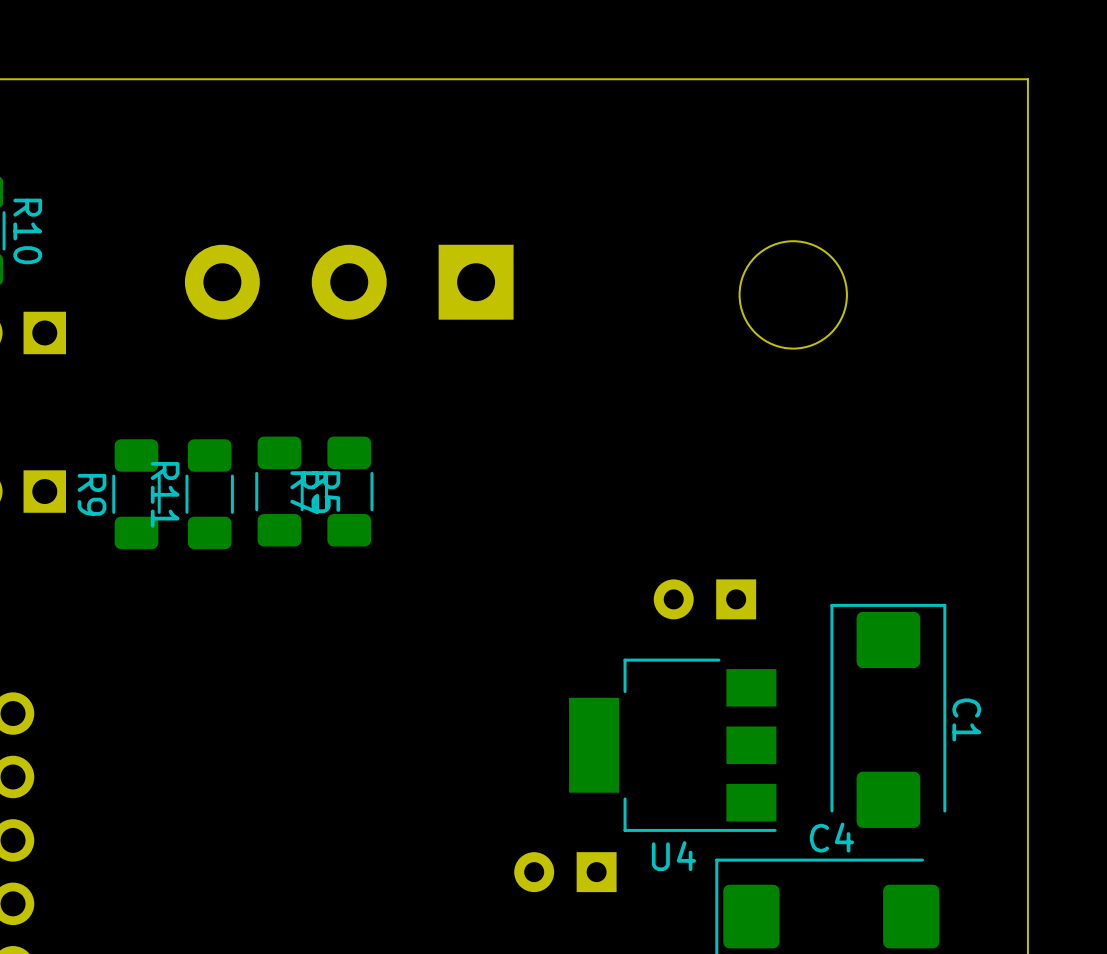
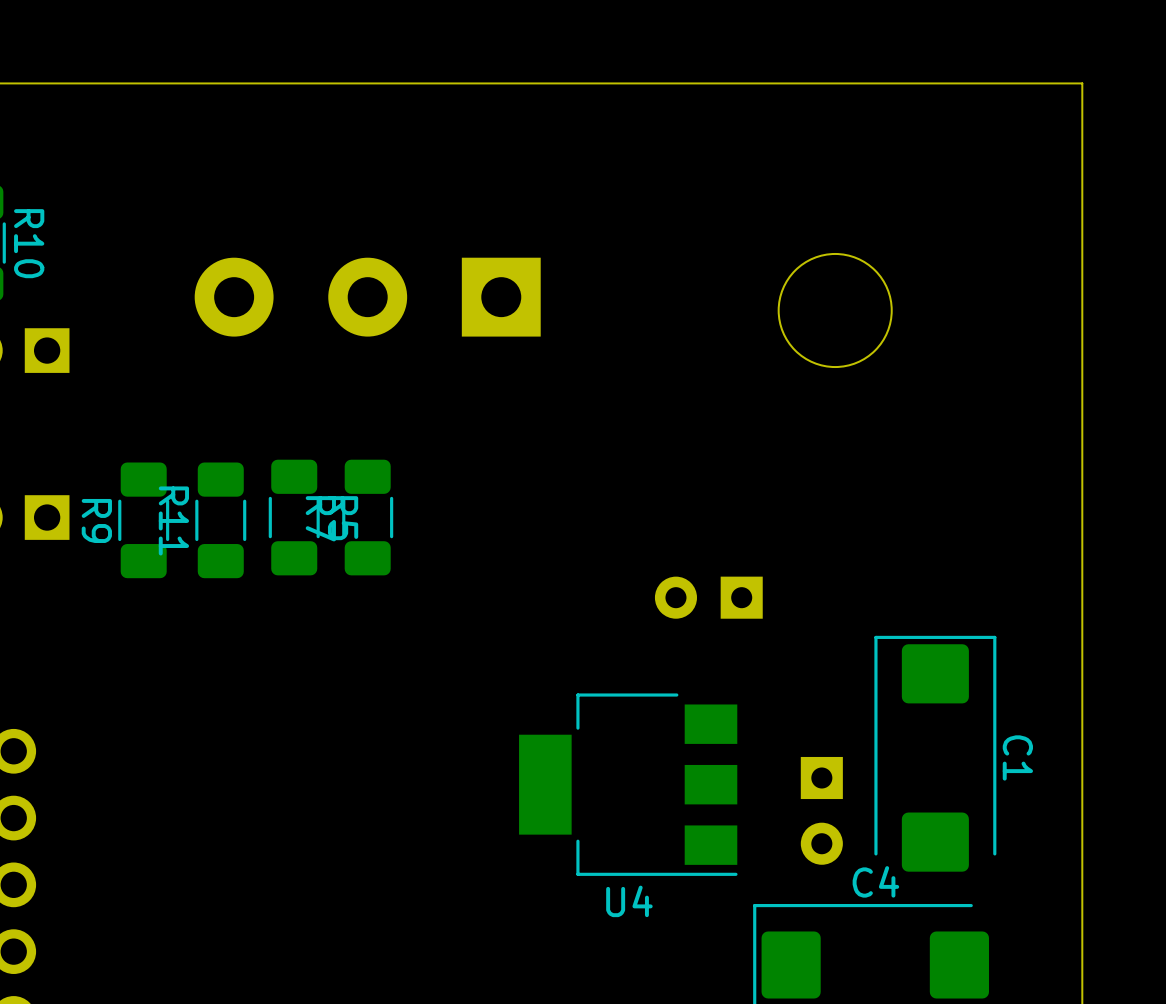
part position: (704, 599) -> (708, 597)
U4 position: (672, 745) -> (628, 784)
part: none -> (821, 810)
part: (565, 872) -> none

